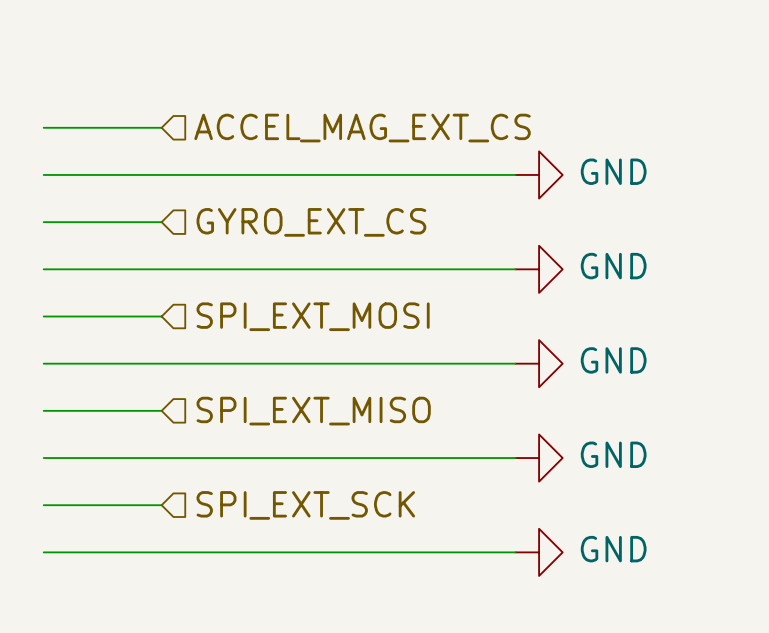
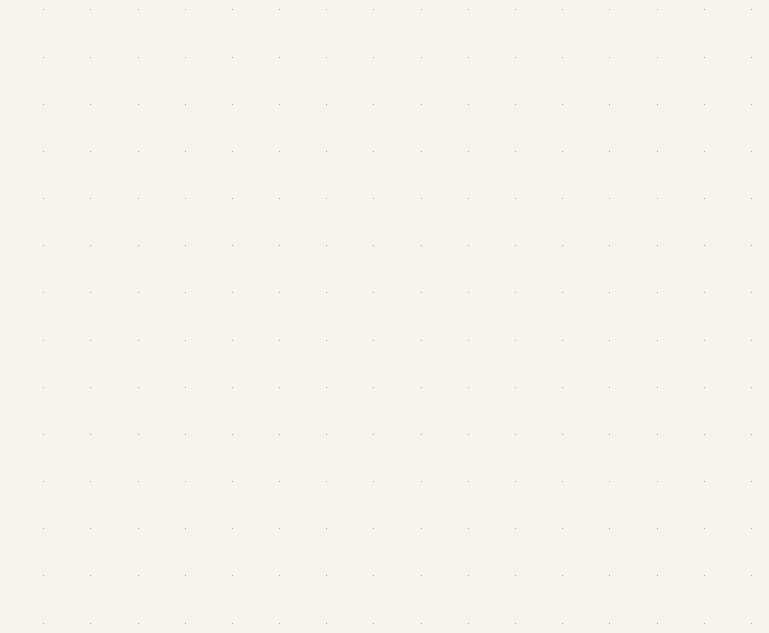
wire: (43, 127) (161, 127) -> none
hierarchical label: ACCEL_MAG_EXT_CS (362, 128) -> none
wire: (43, 174) (515, 174) -> none
power symbol: GND (539, 174) -> none
wire: (43, 222) (161, 222) -> none
hierarchical label: GYRO_EXT_CS (311, 222) -> none
wire: (43, 269) (515, 269) -> none
power symbol: GND (539, 269) -> none
wire: (43, 316) (161, 316) -> none
hierarchical label: SPI_EXT_MOSI (313, 316) -> none
wire: (43, 363) (515, 363) -> none
power symbol: GND (539, 363) -> none
wire: (43, 410) (161, 410) -> none
hierarchical label: SPI_EXT_MISO (313, 411) -> none
wire: (43, 458) (515, 458) -> none
power symbol: GND (539, 458) -> none
wire: (43, 505) (161, 505) -> none
hierarchical label: SPI_EXT_SCK (305, 505) -> none
wire: (43, 552) (515, 552) -> none
power symbol: GND (539, 552) -> none

